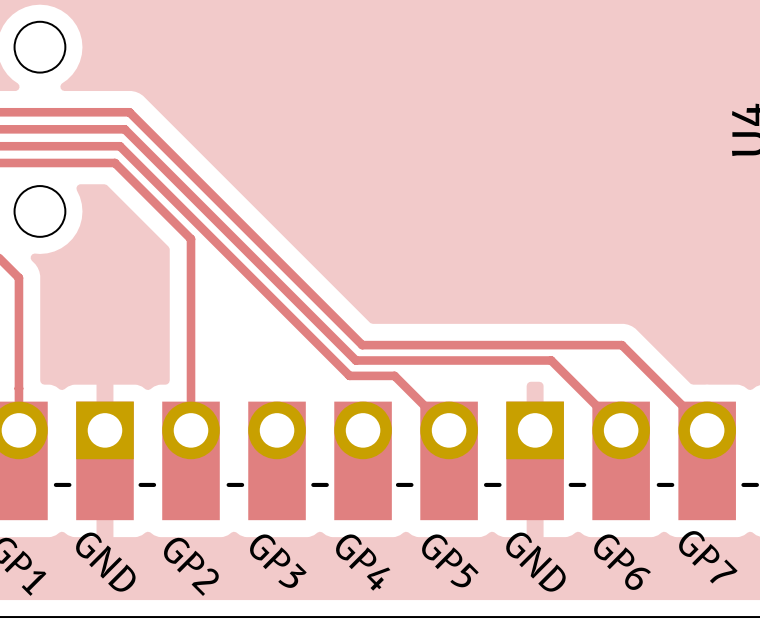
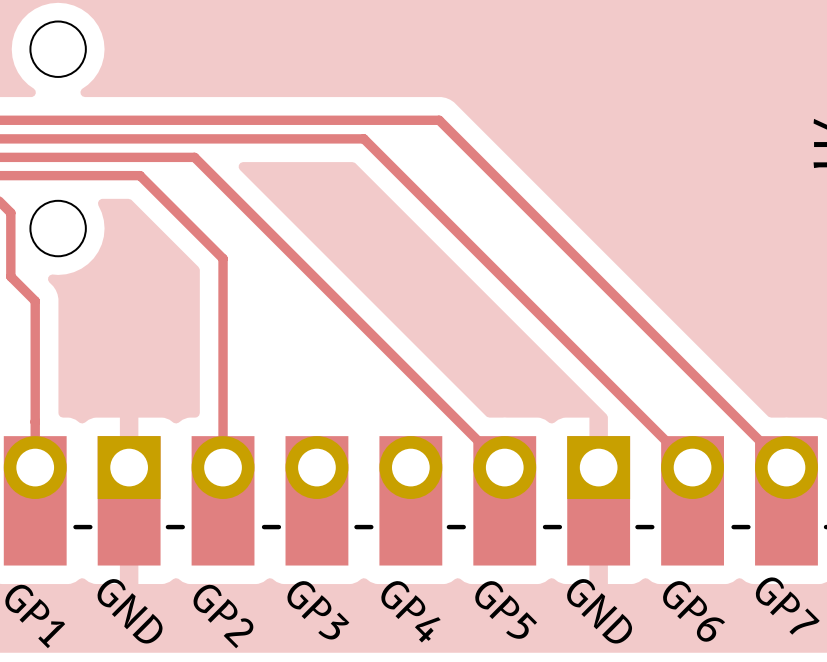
track: (129, 112) (362, 345) (621, 345) -> (155, 120) (439, 120) (693, 374)
track: (124, 129) (355, 360) (551, 360) -> (150, 138) (363, 138) (616, 391)
track: (119, 146) (349, 375) (394, 375) -> (145, 157) (194, 157) (445, 408)

